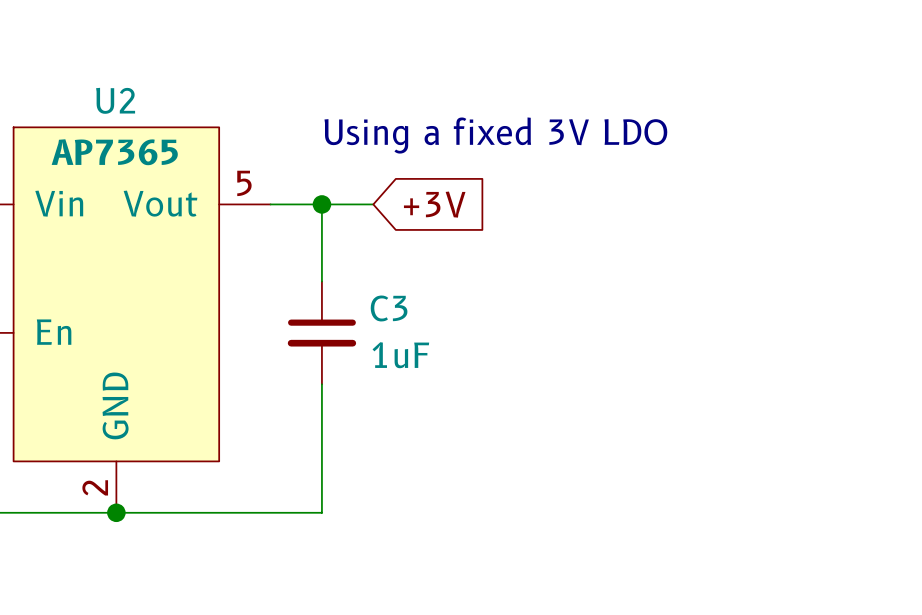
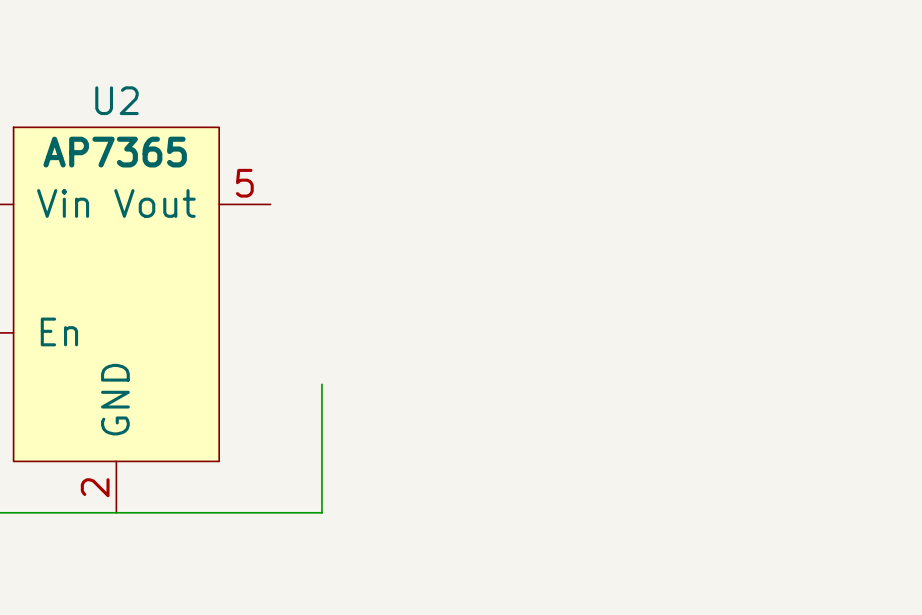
text: Using a fixed 3V LDO (495, 135) -> none
wire: (270, 204) (373, 204) -> none
wire: (321, 204) (321, 281) -> none
junction: (321, 204) -> none
global label: +3V (434, 204) -> none
C3: 1uF (321, 332) -> none
junction: (116, 512) -> none

